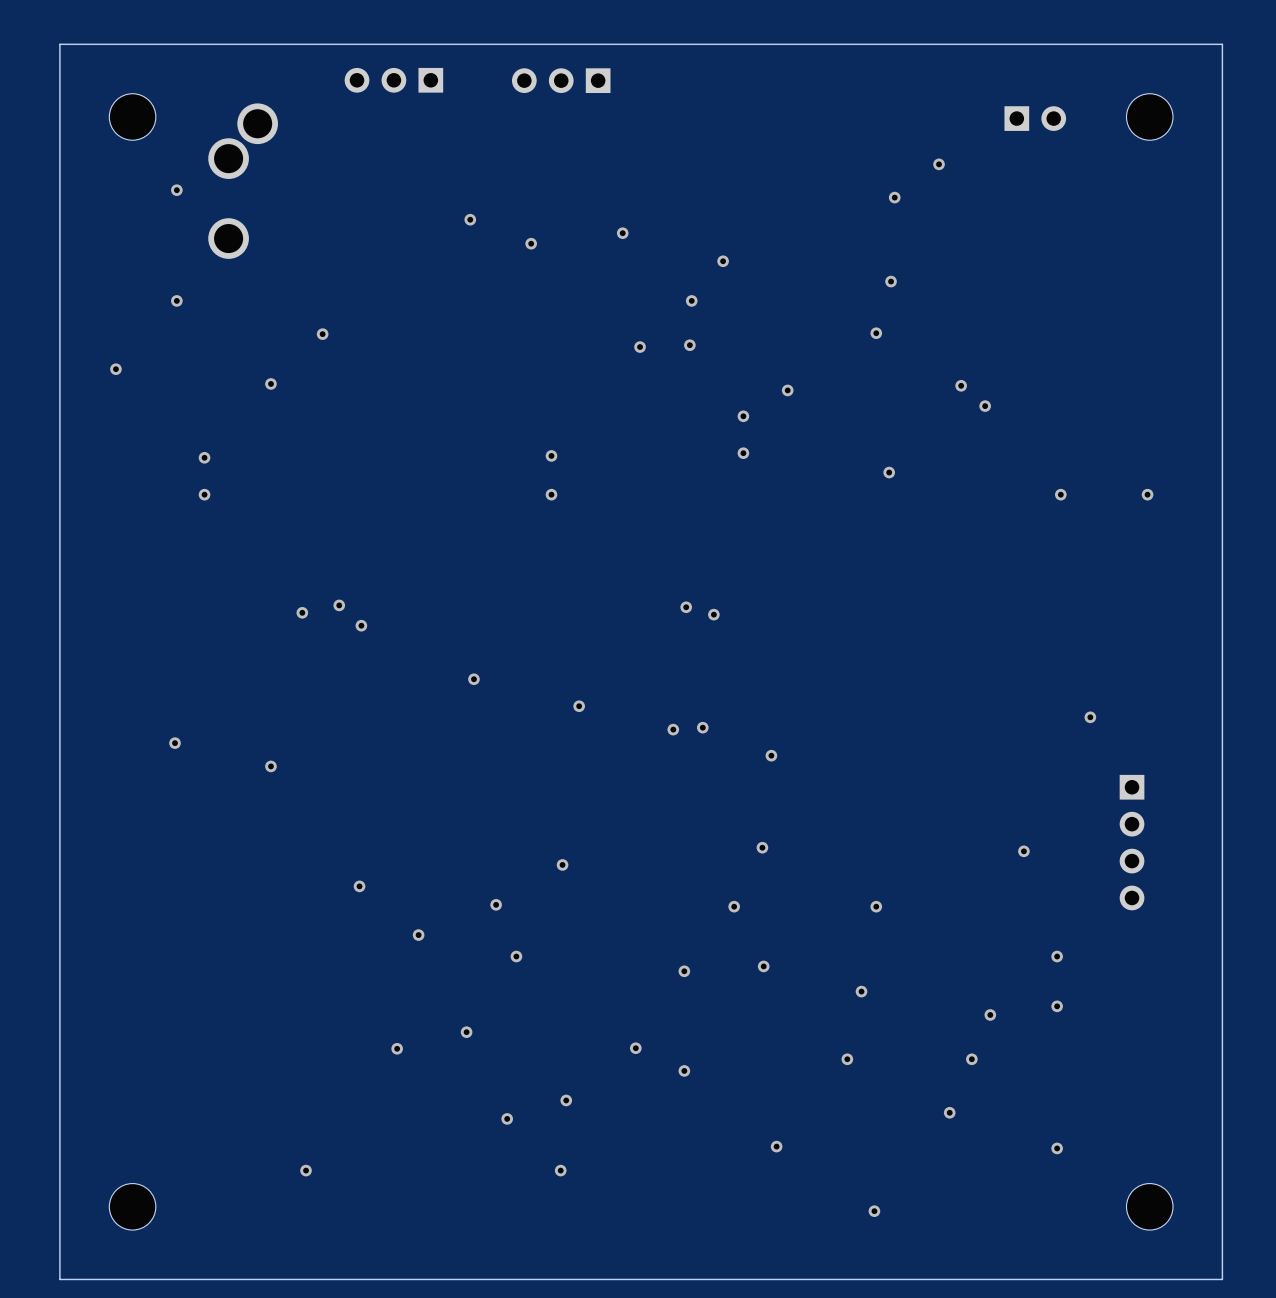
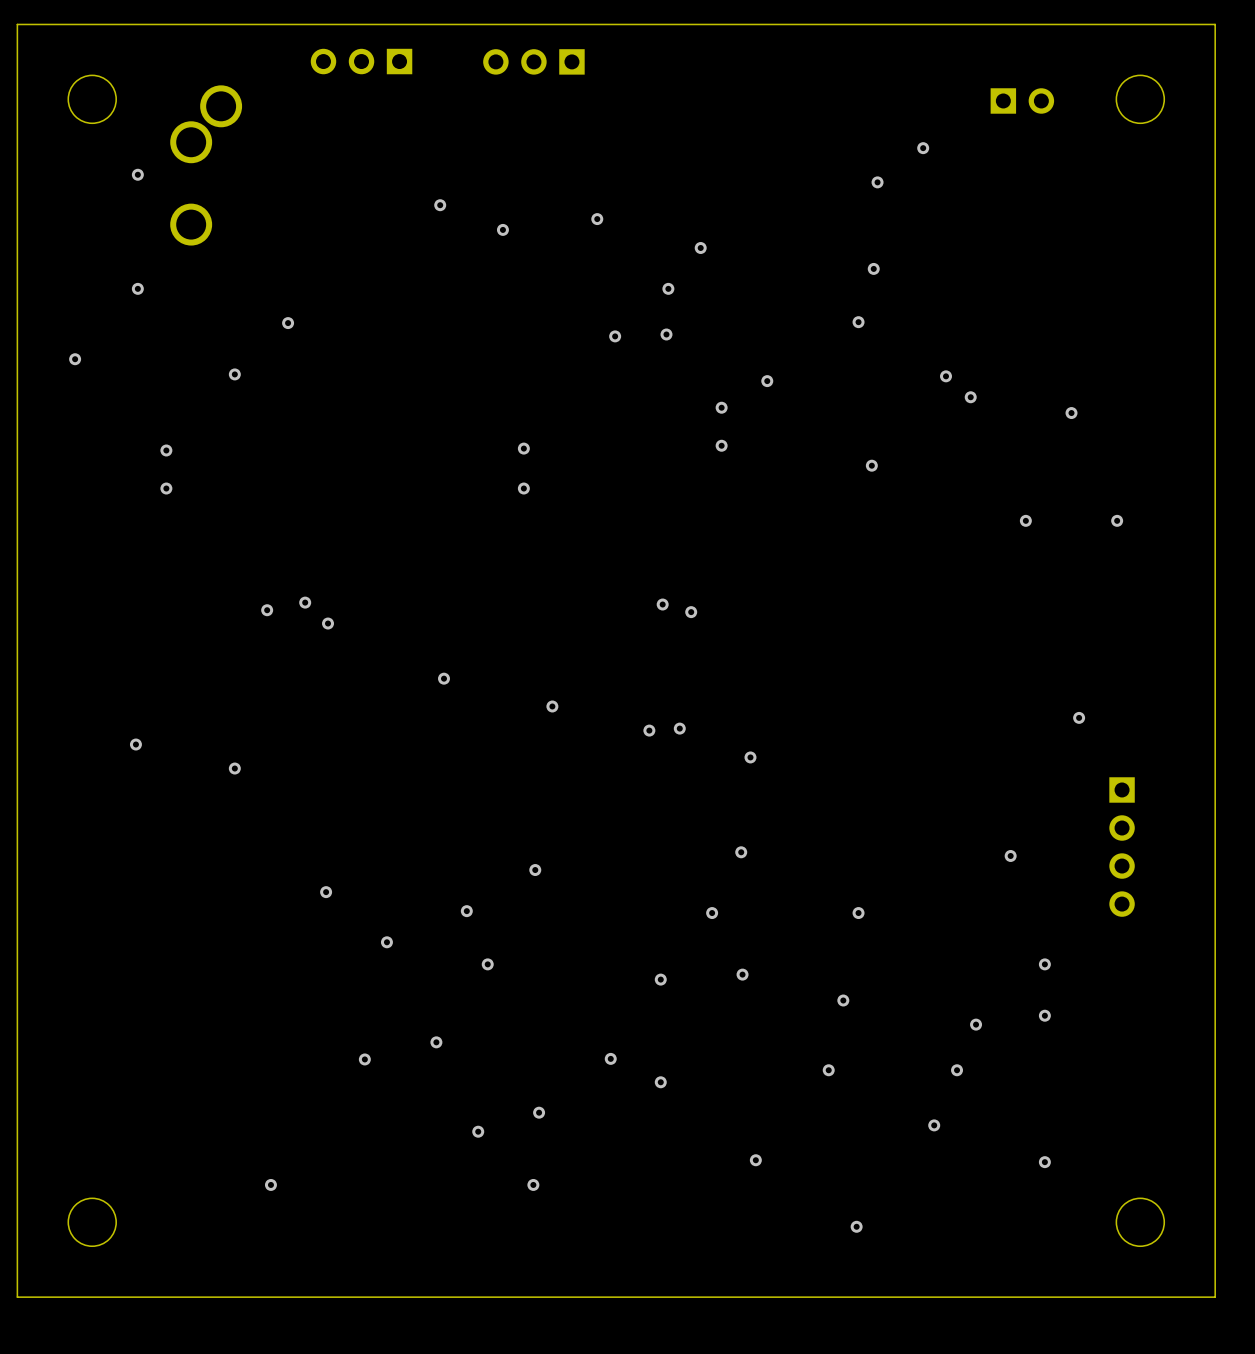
via: none -> (1071, 413)
via: (1060, 494) -> none
via: (1147, 494) -> none
via: none -> (1025, 520)
via: none -> (1117, 520)

